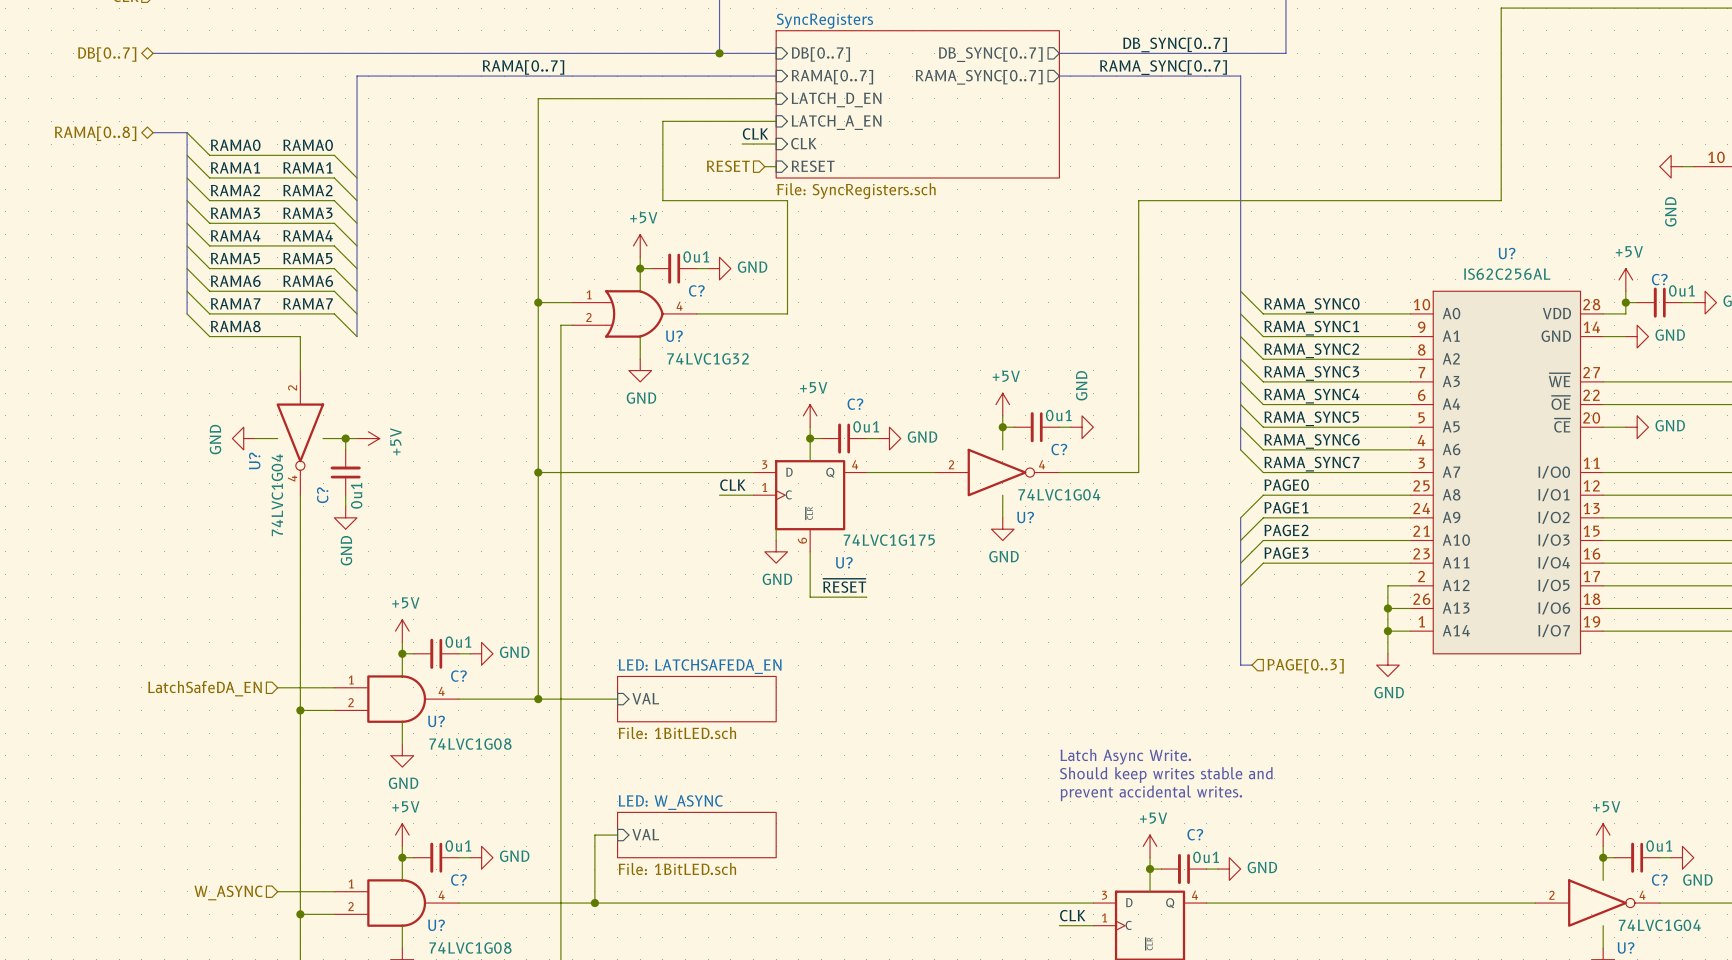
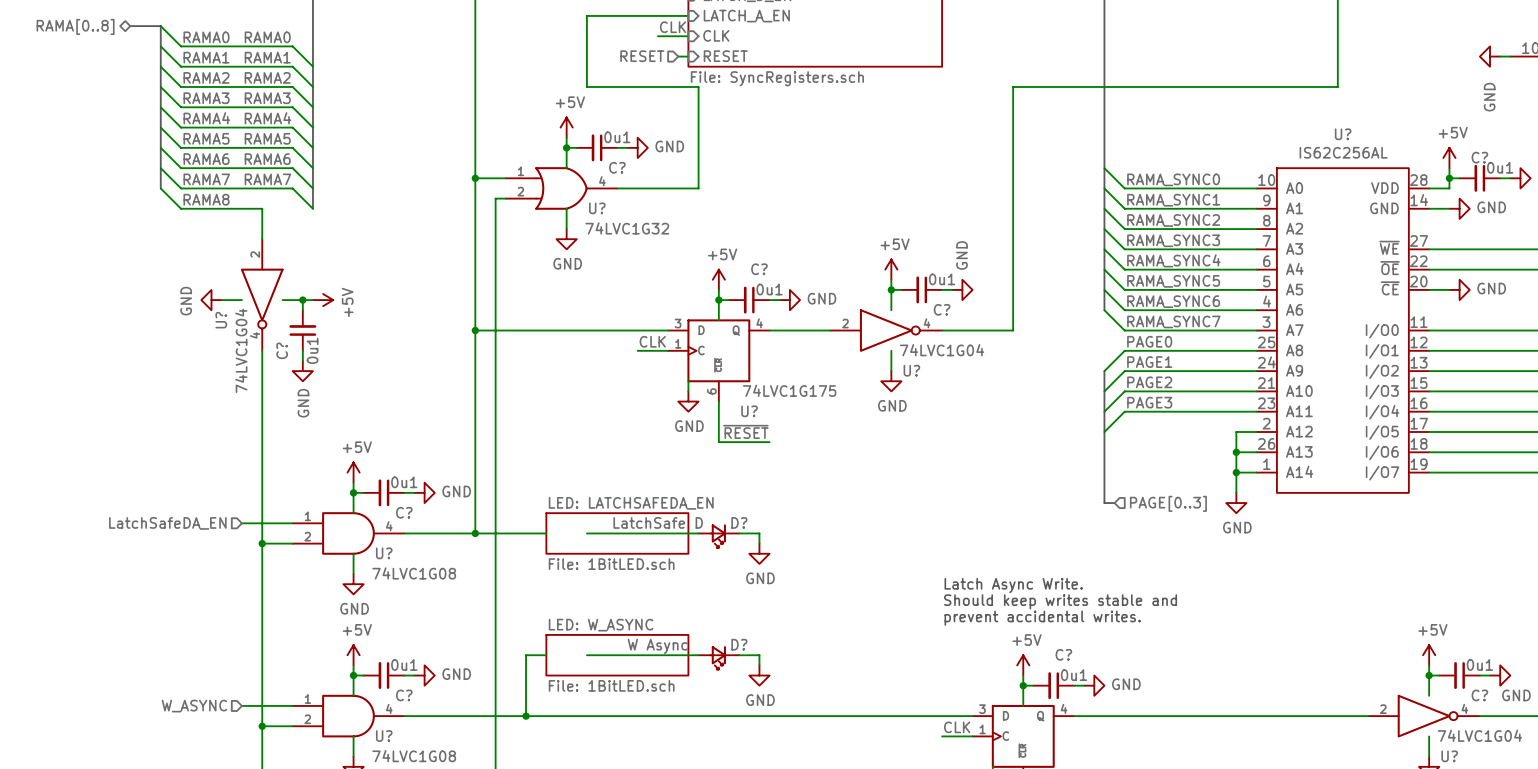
sheet pin: VAL (645, 698) -> none
wire: none -> (586, 533) (698, 533)
wire: none -> (739, 533) (759, 533) (759, 543)
D?: none -> LatchSafe D (718, 536)
power symbol: none -> GND (759, 553)
sheet pin: VAL (645, 834) -> none
wire: none -> (586, 655) (698, 655)
wire: none -> (739, 655) (759, 655) (759, 665)
D?: none -> W Async (718, 657)
power symbol: none -> GND (759, 675)

